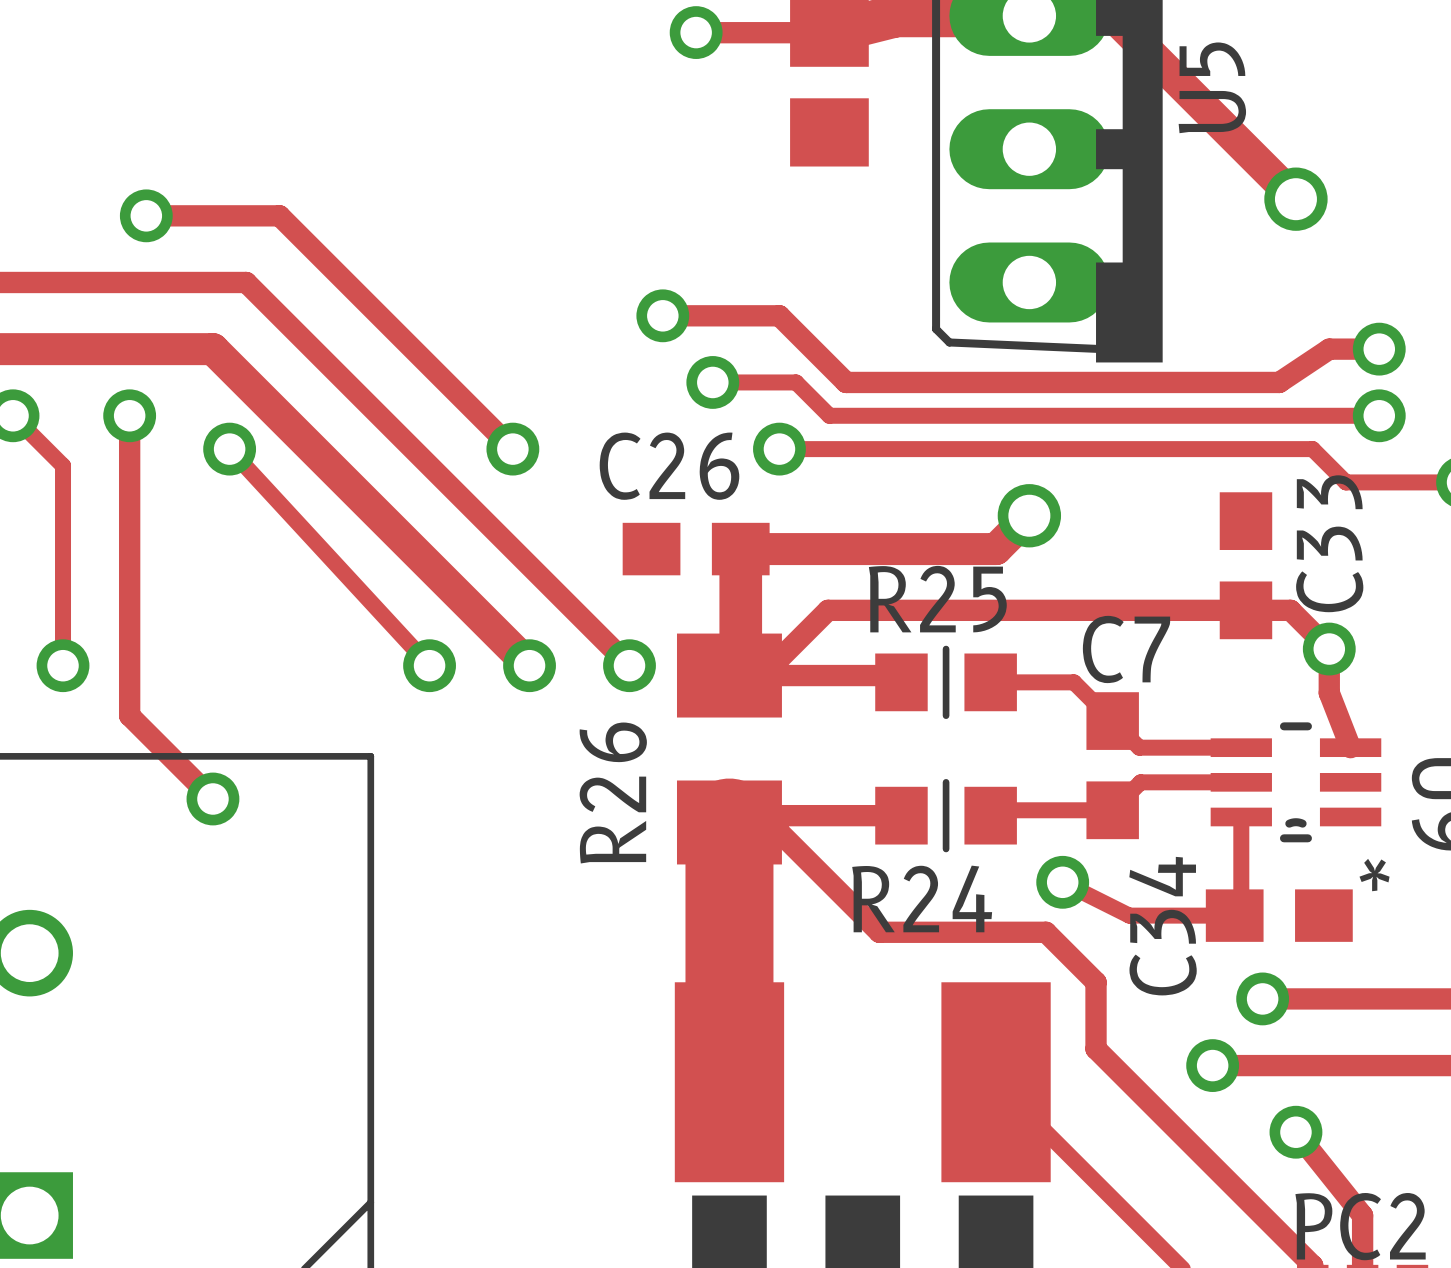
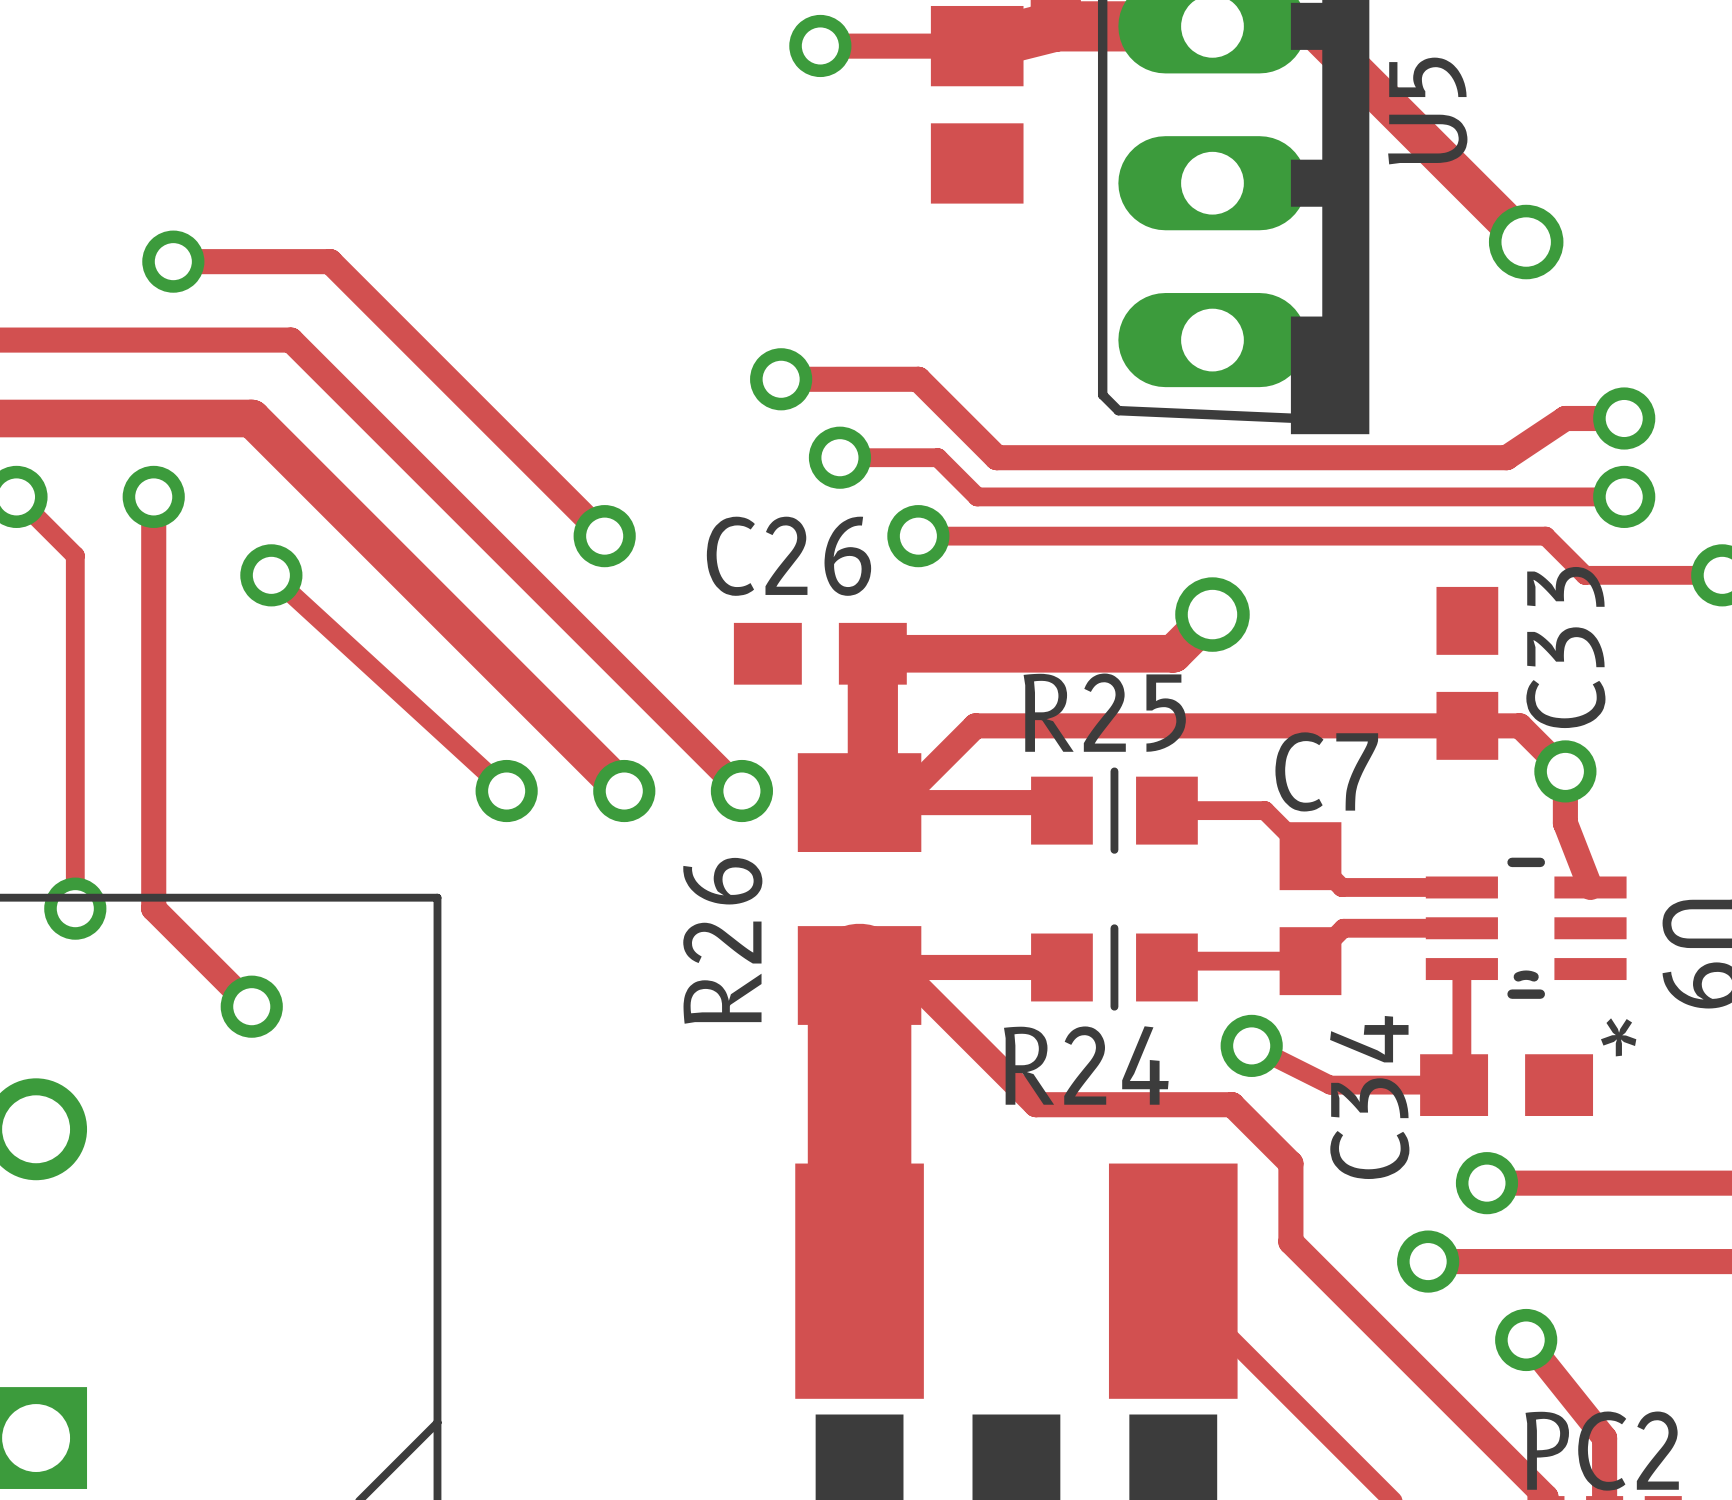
track: (229, 449) (429, 665) -> (271, 575) (506, 791)
via position: (229, 449) -> (271, 575)
track: none -> (75, 791) (75, 908)
via: (63, 665) -> none
track: (129, 715) (212, 798) -> (153, 849) (153, 908) (251, 1006)
via: none -> (75, 908)
via position: (212, 798) -> (251, 1006)

